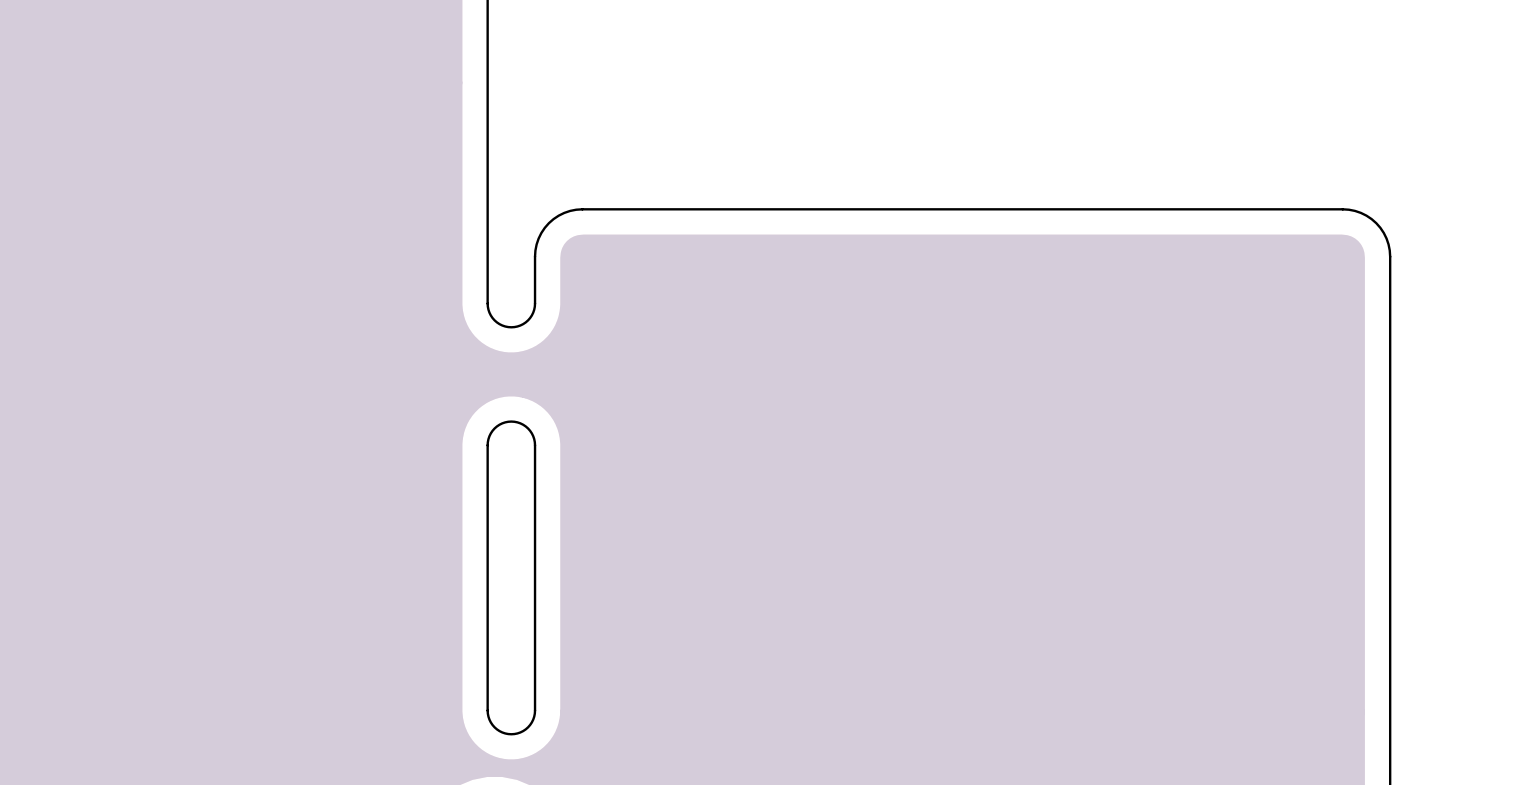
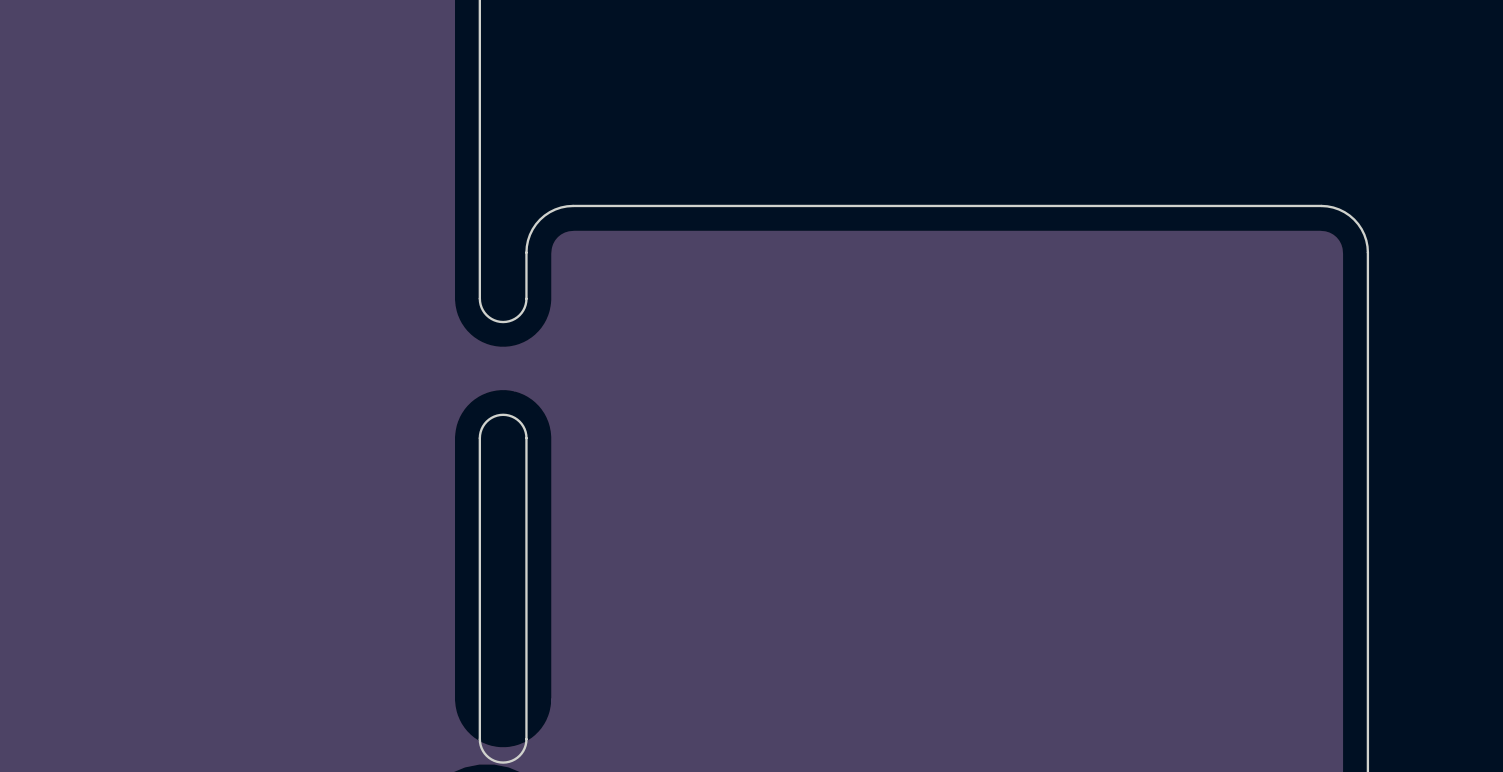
board edge: (535, 710) (533, 719) (528, 727) (520, 732) (511, 734) (502, 732) (494, 727) (489, 719) (487, 710) -> (526, 699) (524, 748) (517, 757) (503, 762) (491, 759) (481, 748) (479, 699)

